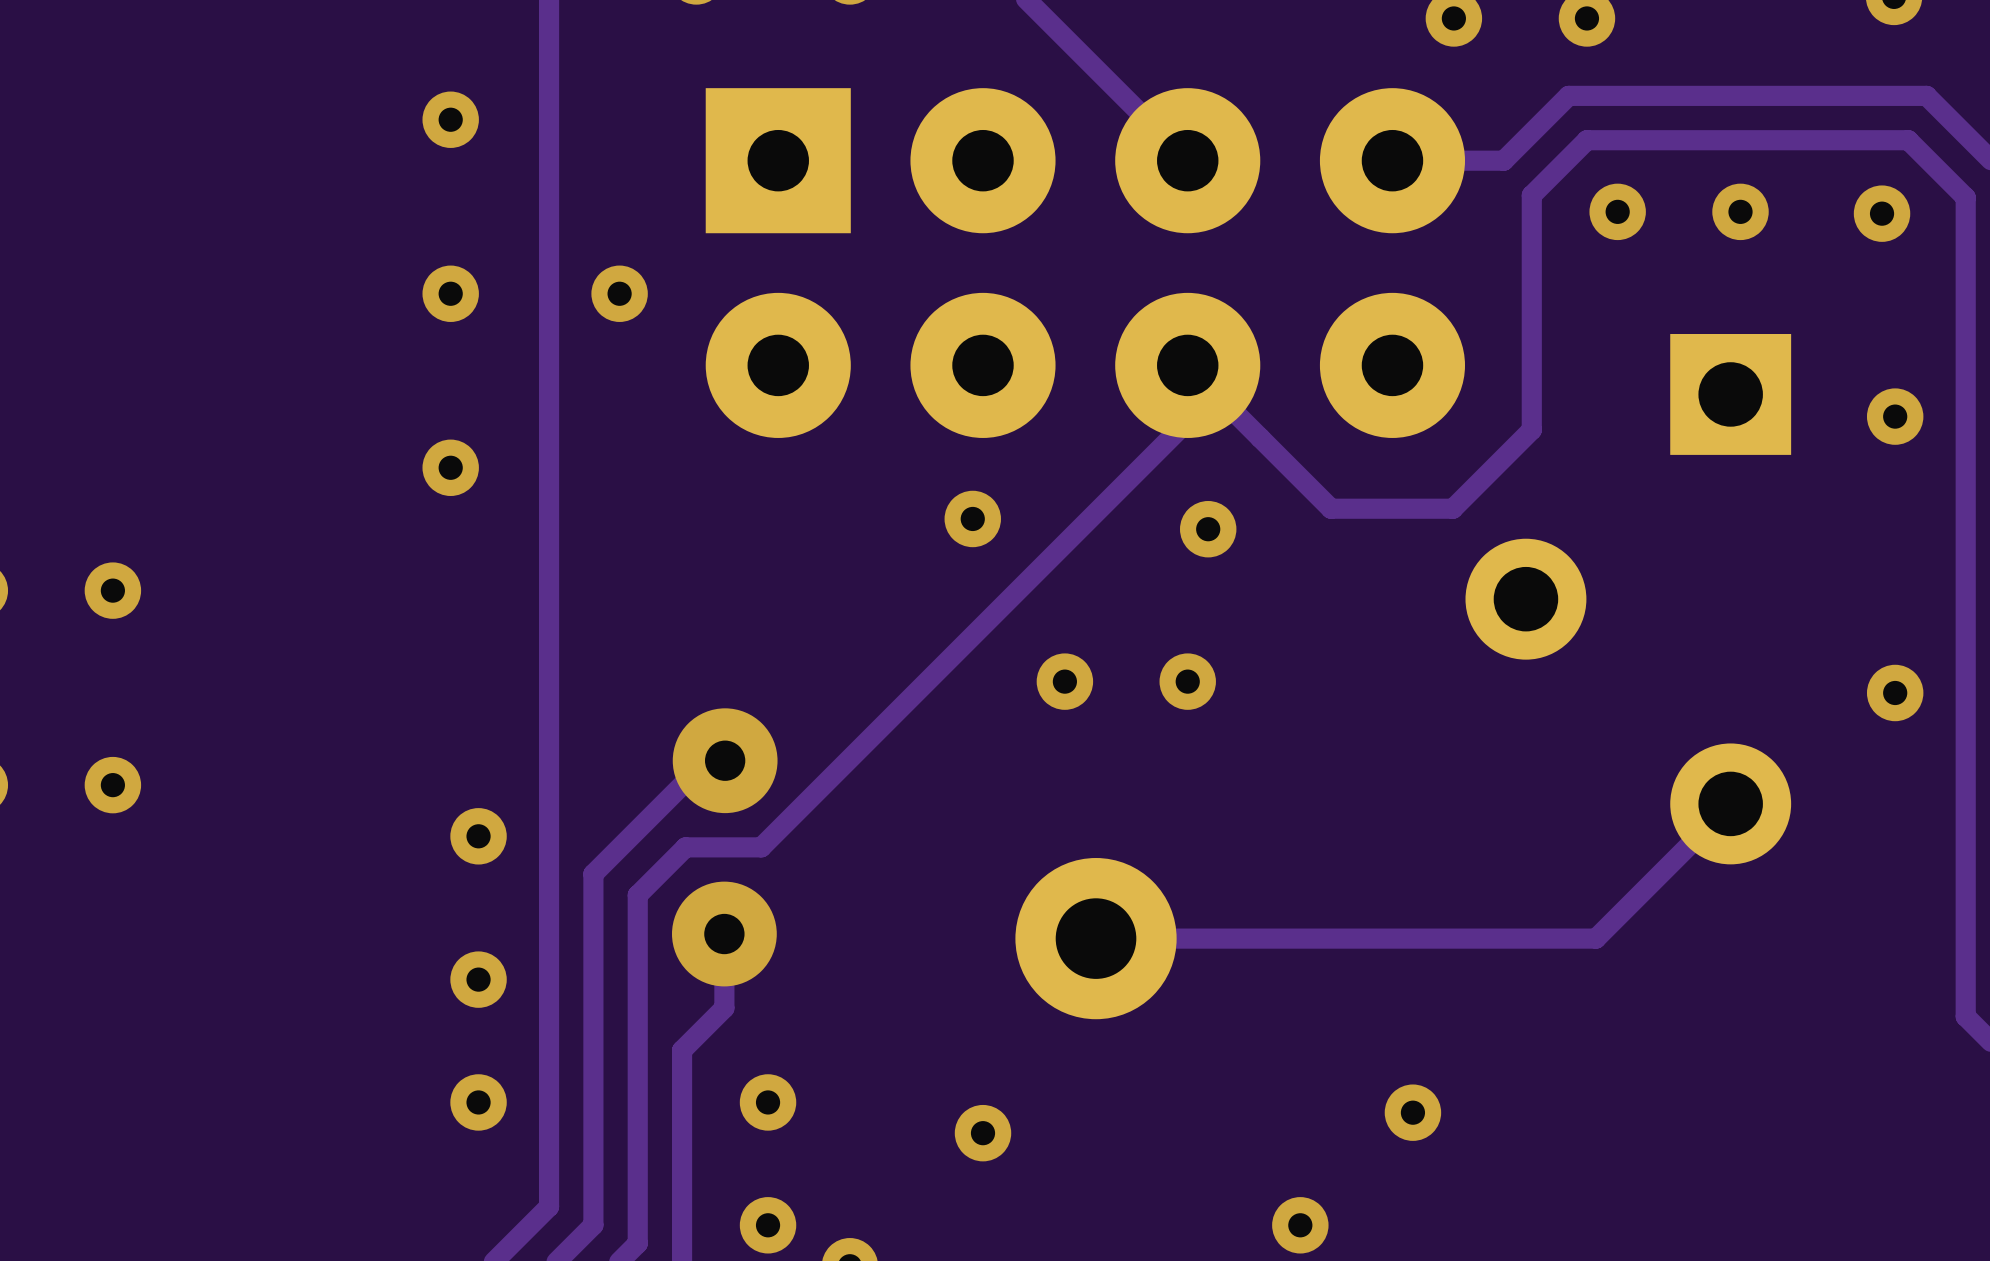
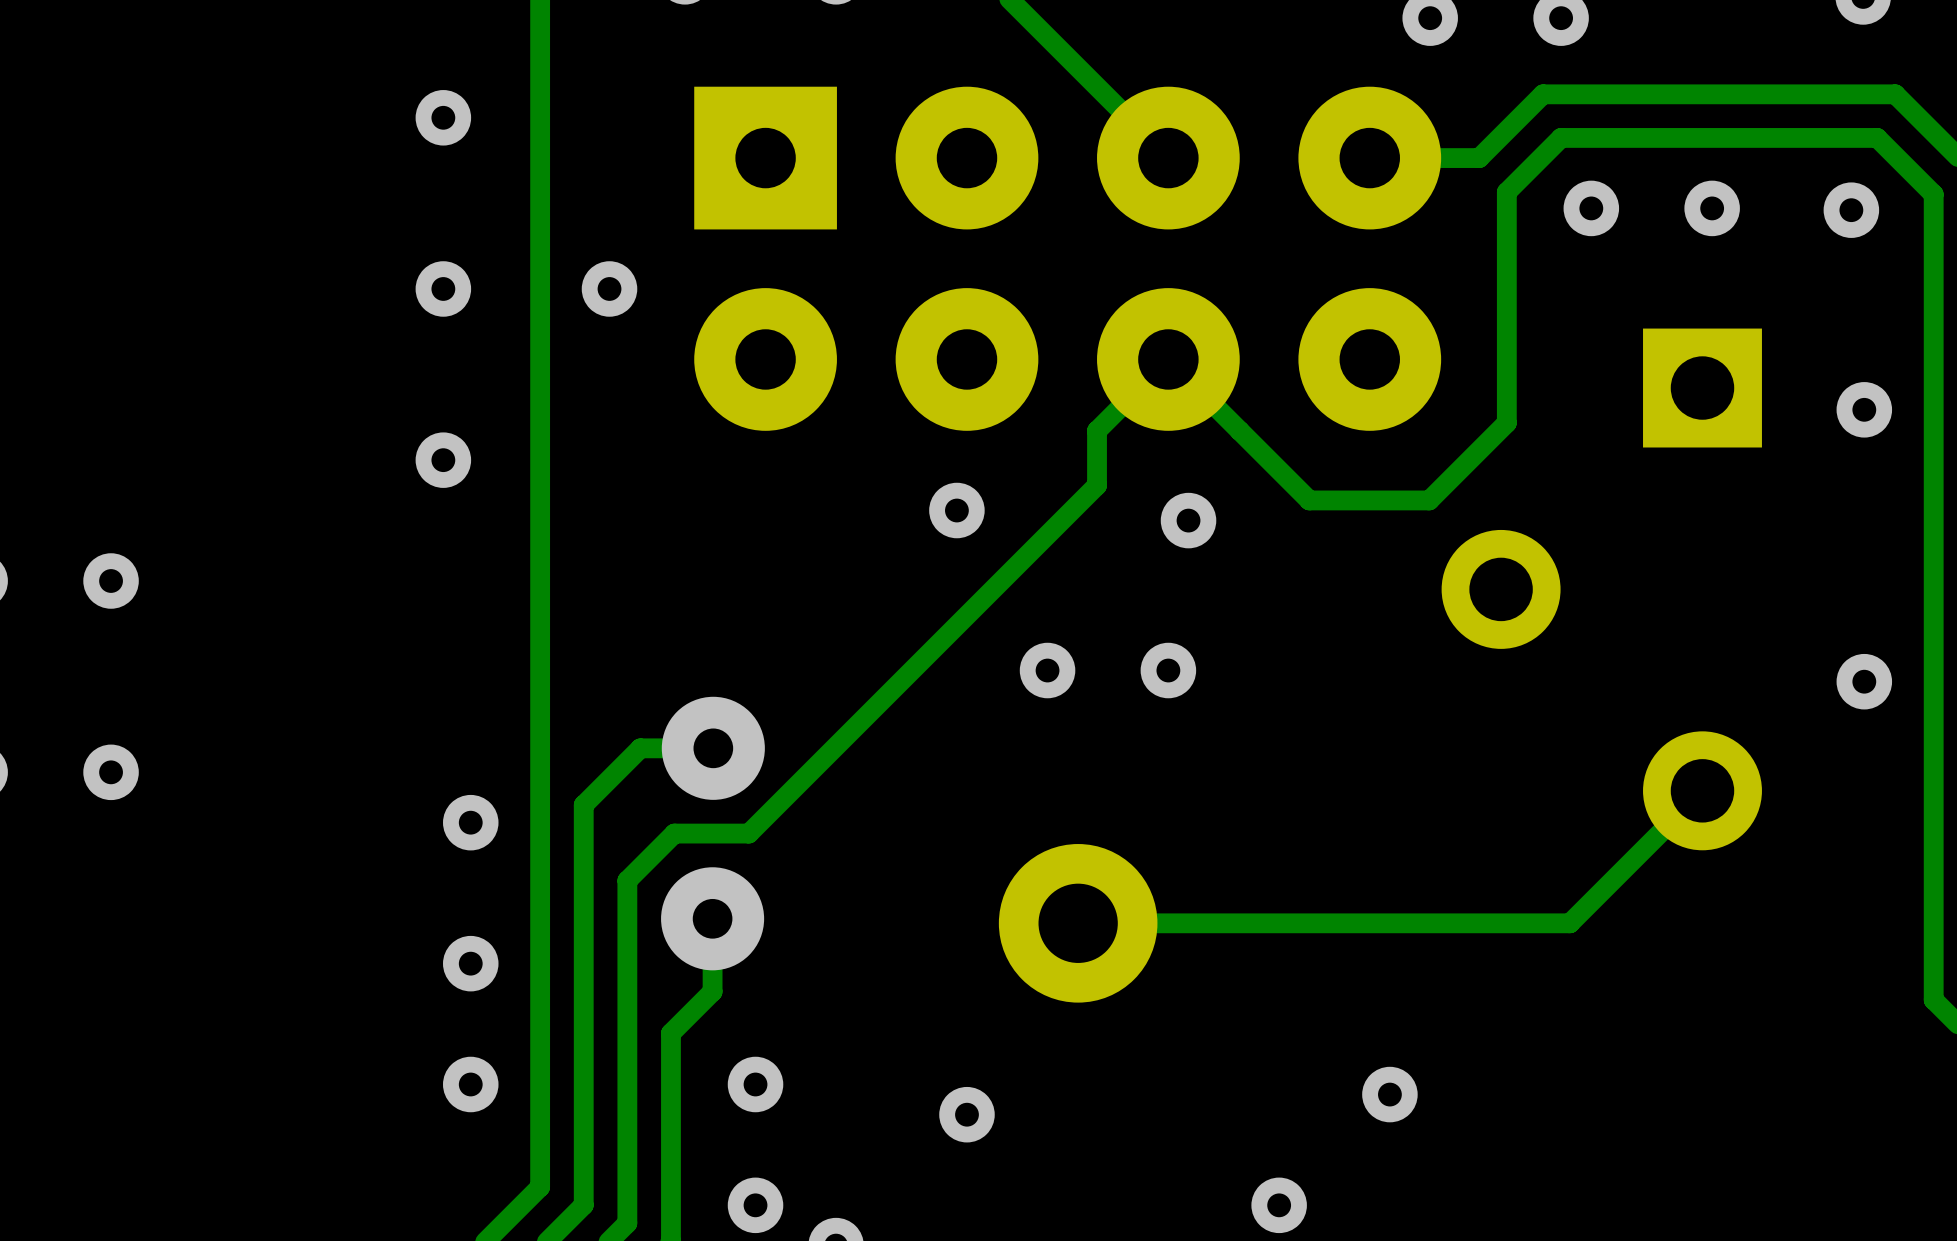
track: (1187, 365) (1187, 420) (1115, 493) -> (1168, 359) (1097, 430) (1097, 485)
track: (706, 760) (593, 874) -> (695, 748) (640, 748) (583, 805) (583, 859)

